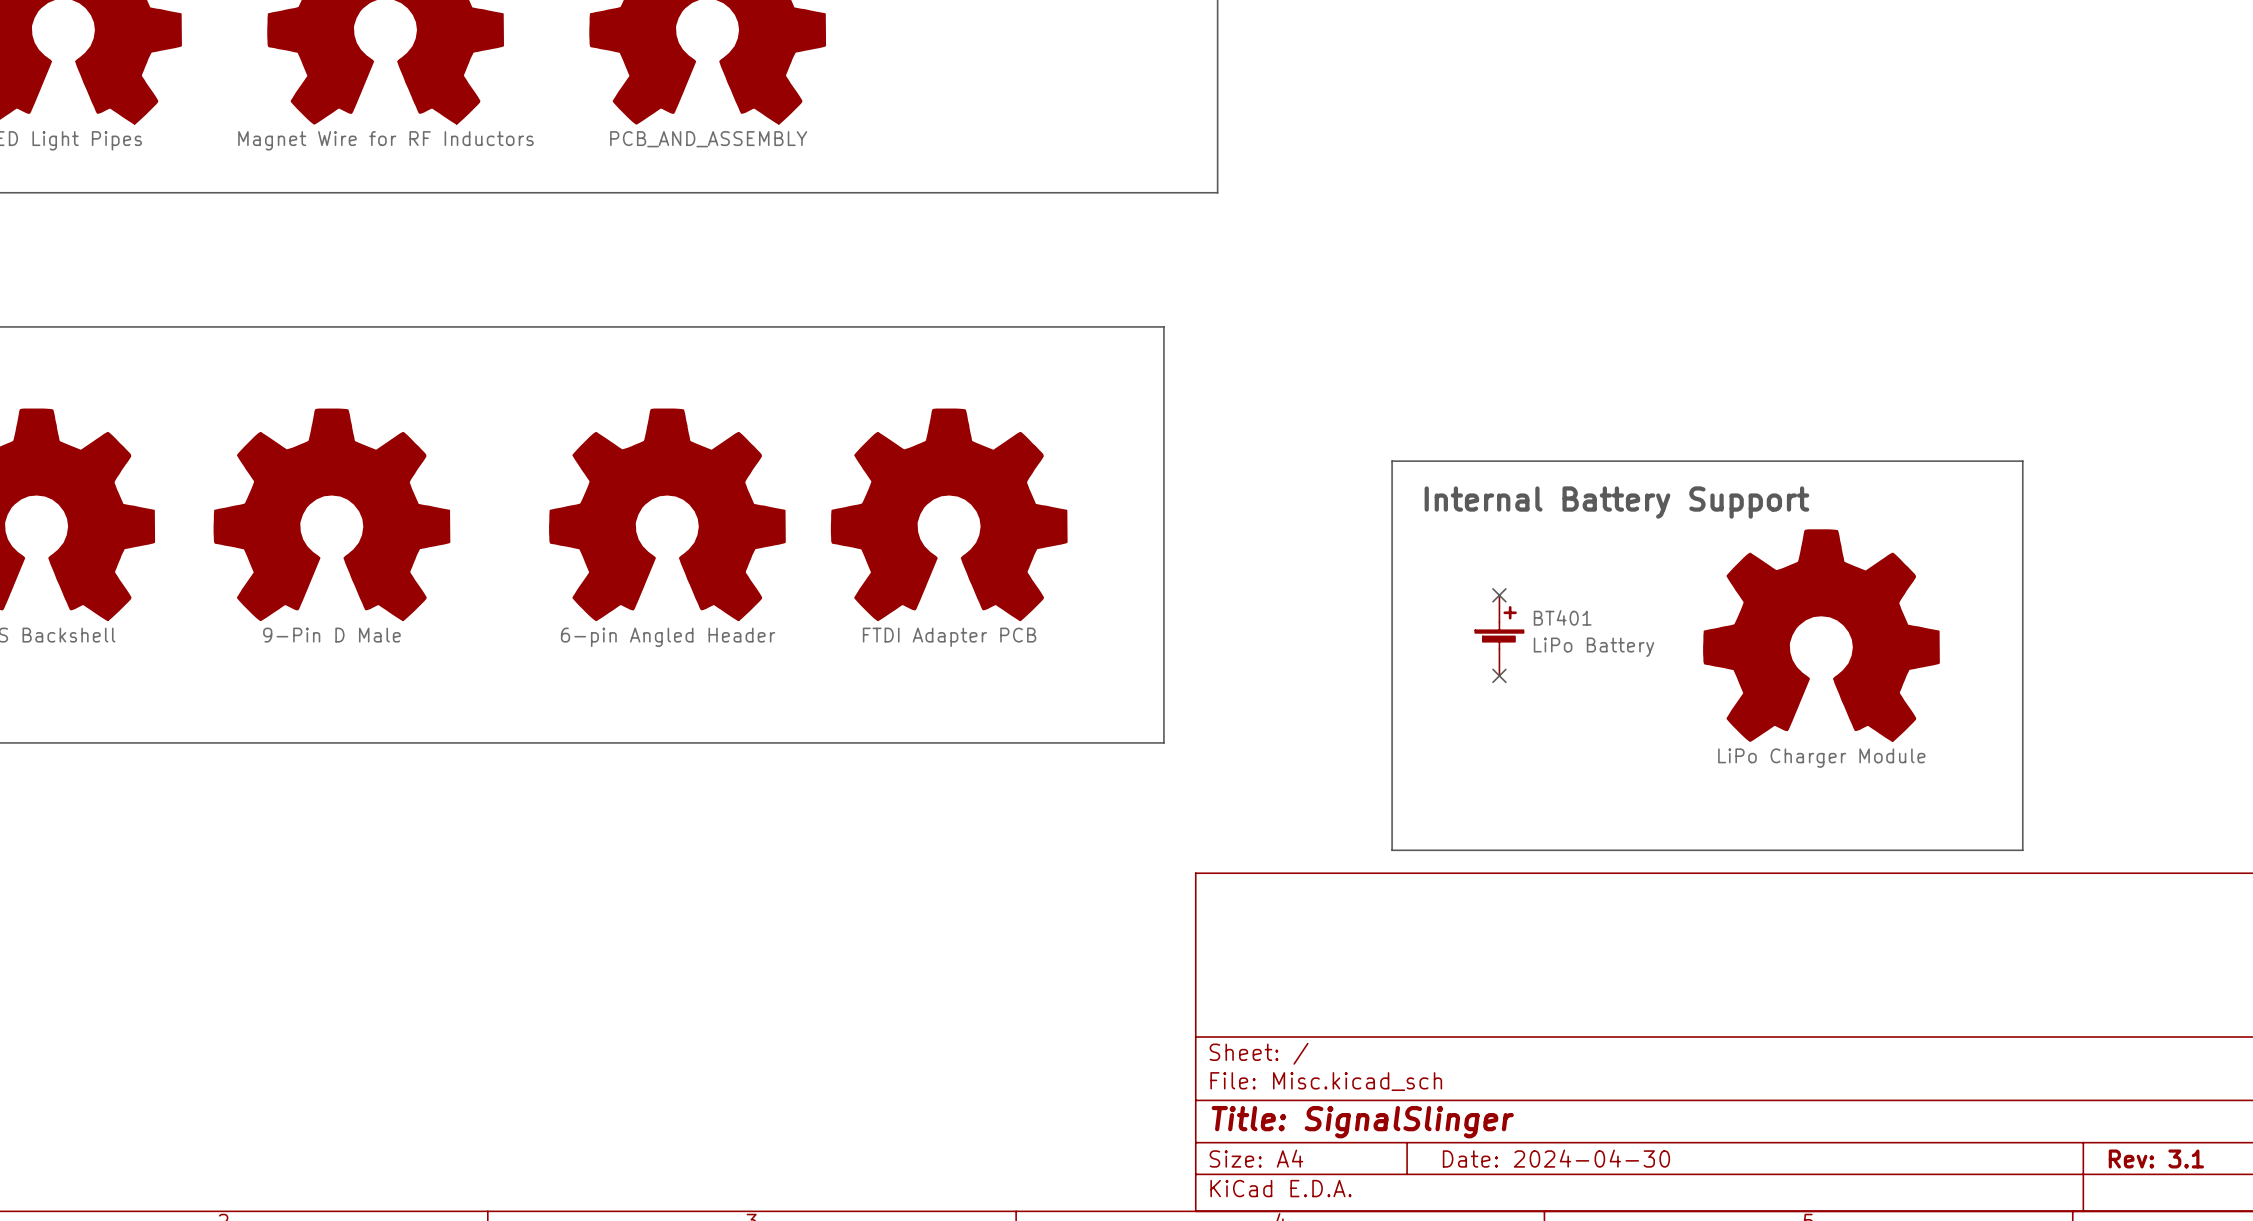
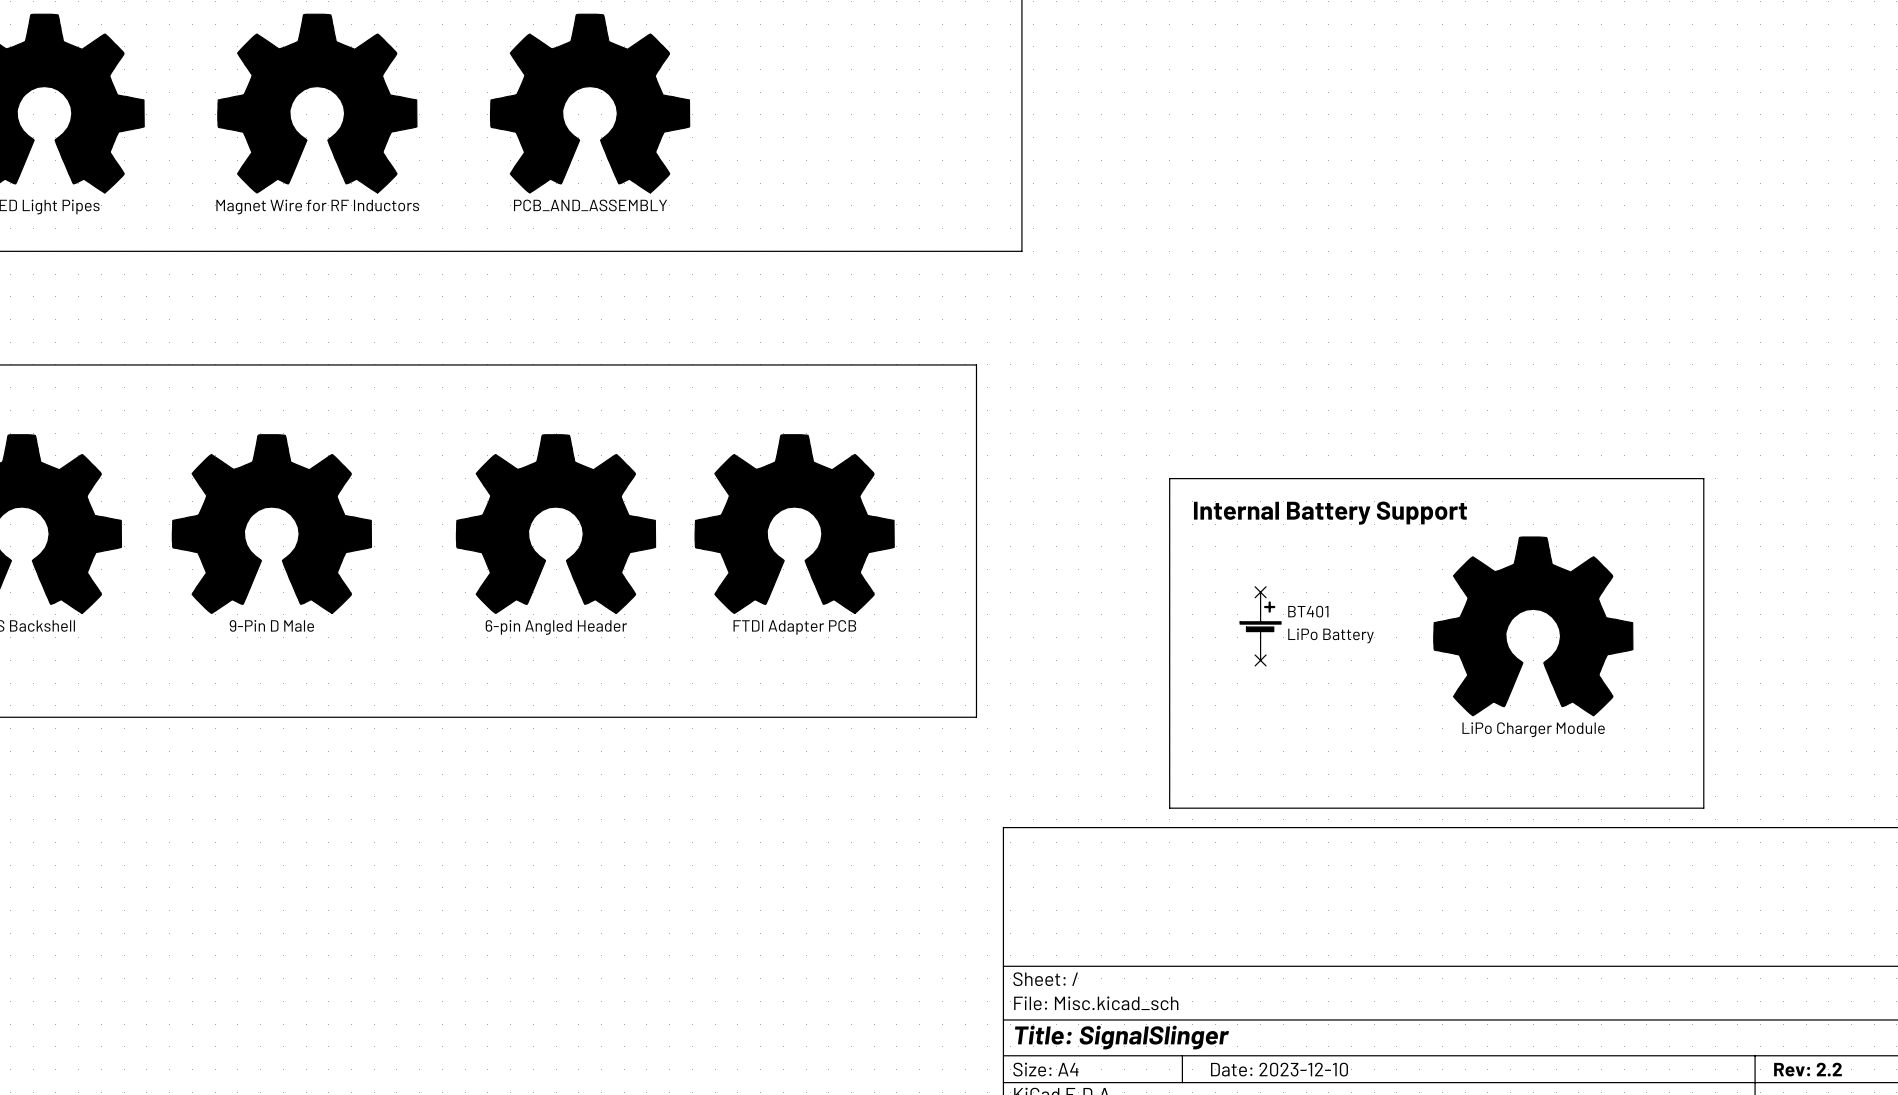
title block: Date: 2024-04-30 (1556, 1158) -> Date: 2023-12-10 (1279, 1069)
title block: Rev: 3.1 (2156, 1158) -> Rev: 2.2 (1807, 1069)

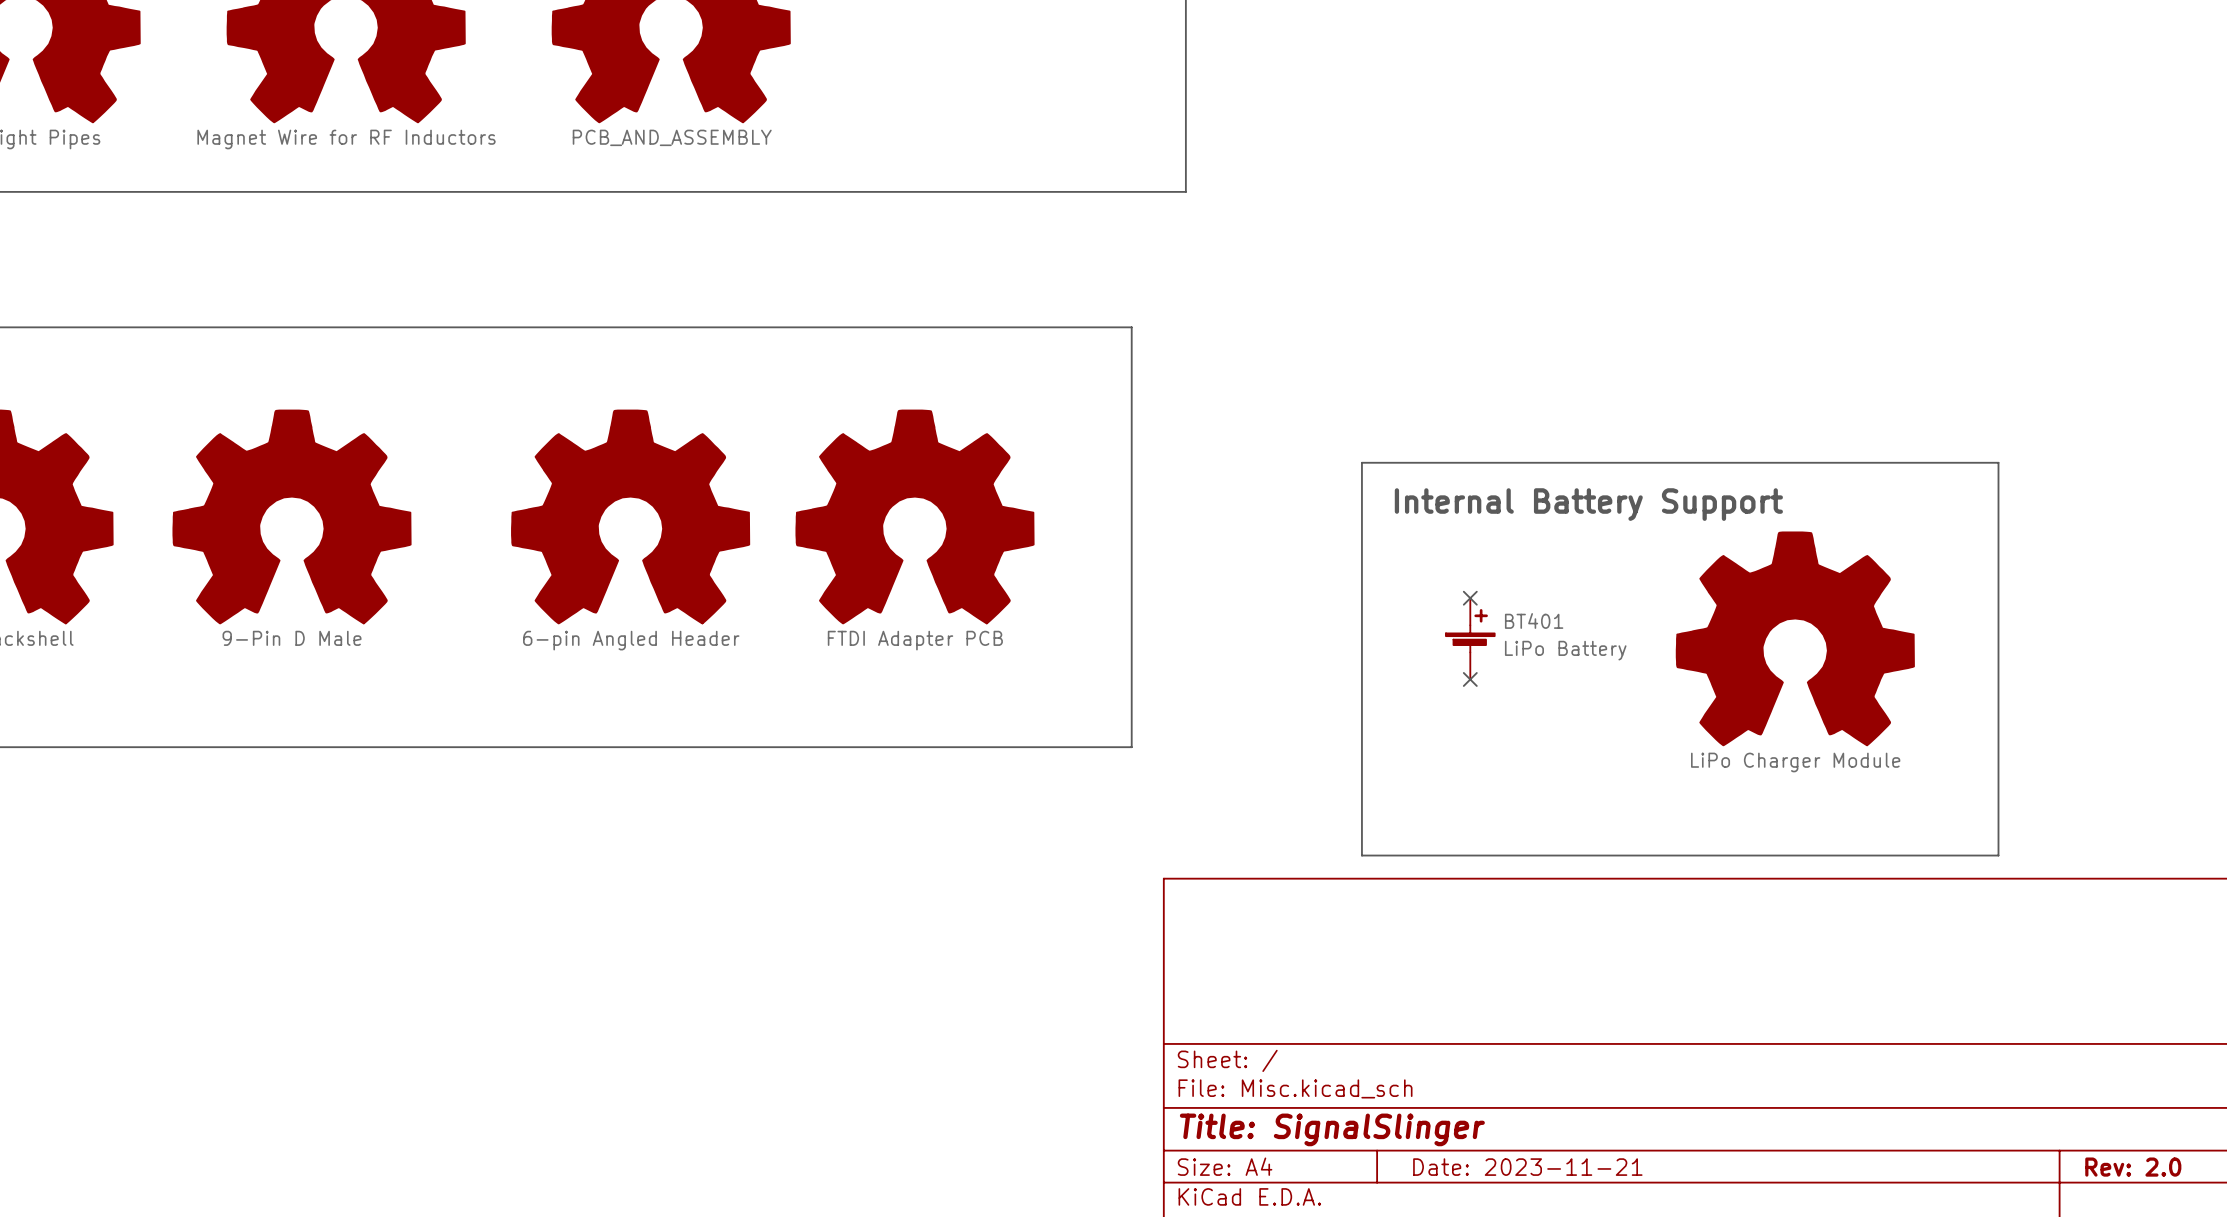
title block: Date: 2023-12-10 (1279, 1069) -> Date: 2023-11-21 (1527, 1167)
title block: Rev: 2.2 (1807, 1069) -> Rev: 2.0 (2133, 1167)

